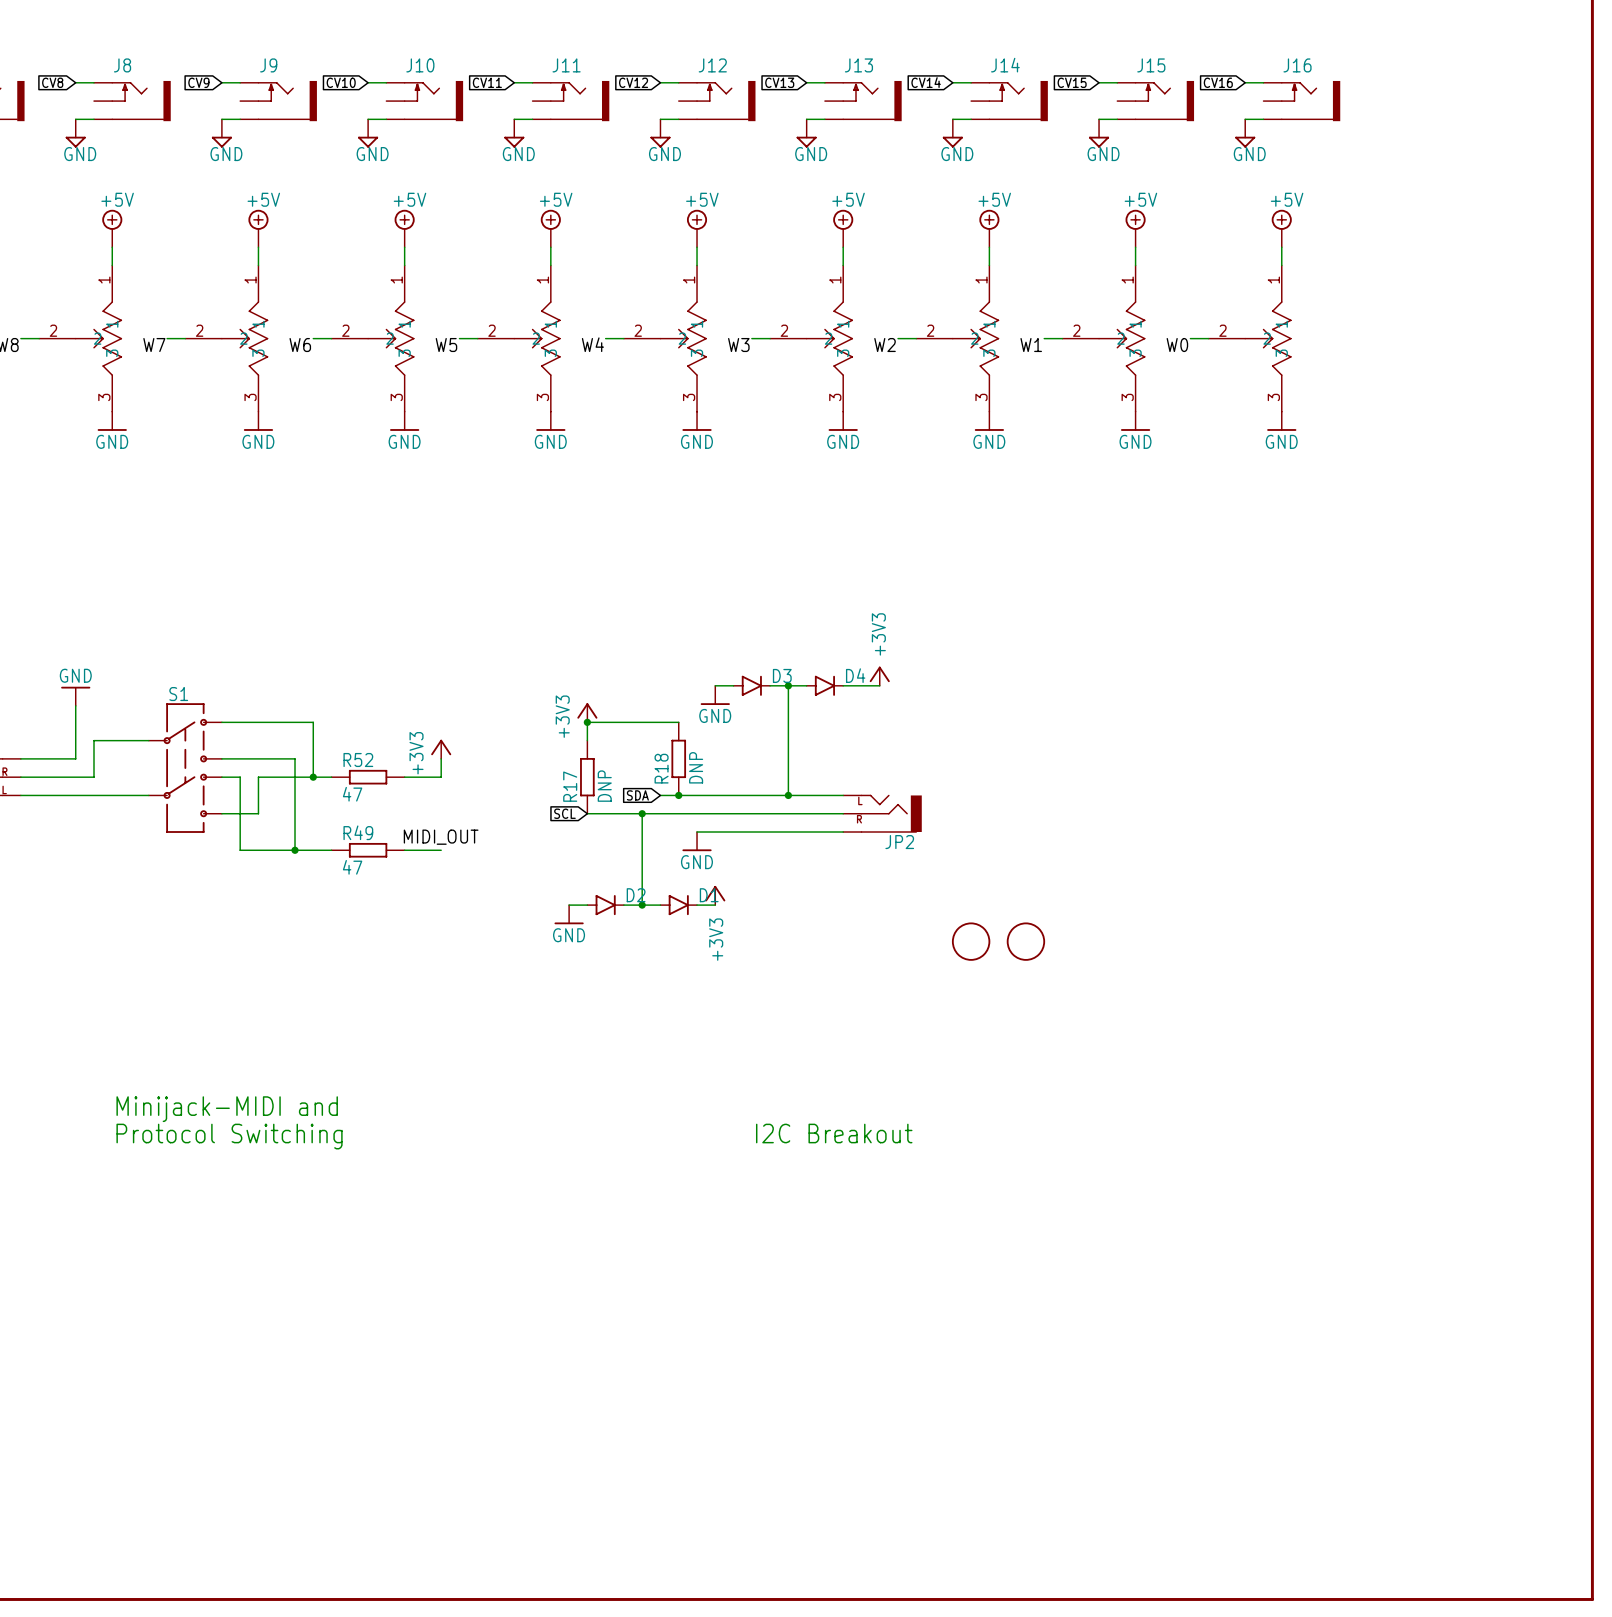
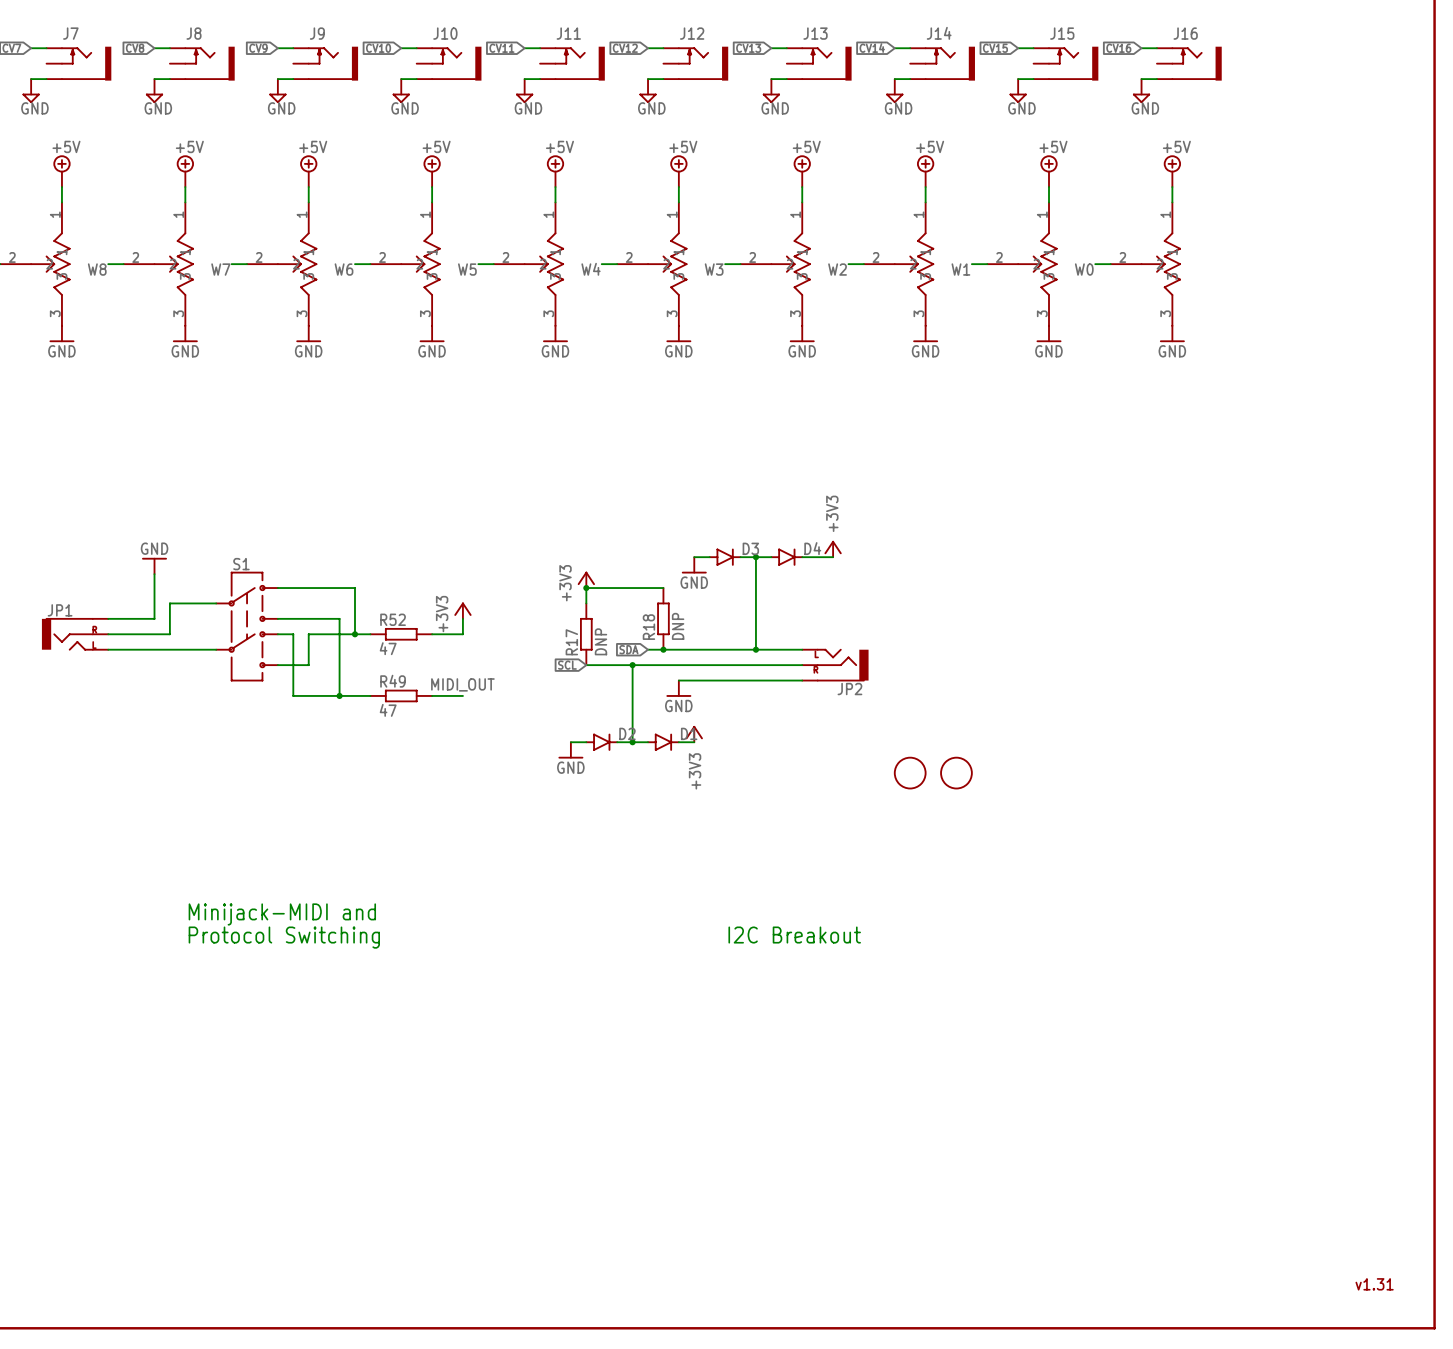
text: none -> v1.31 (1374, 1284)

